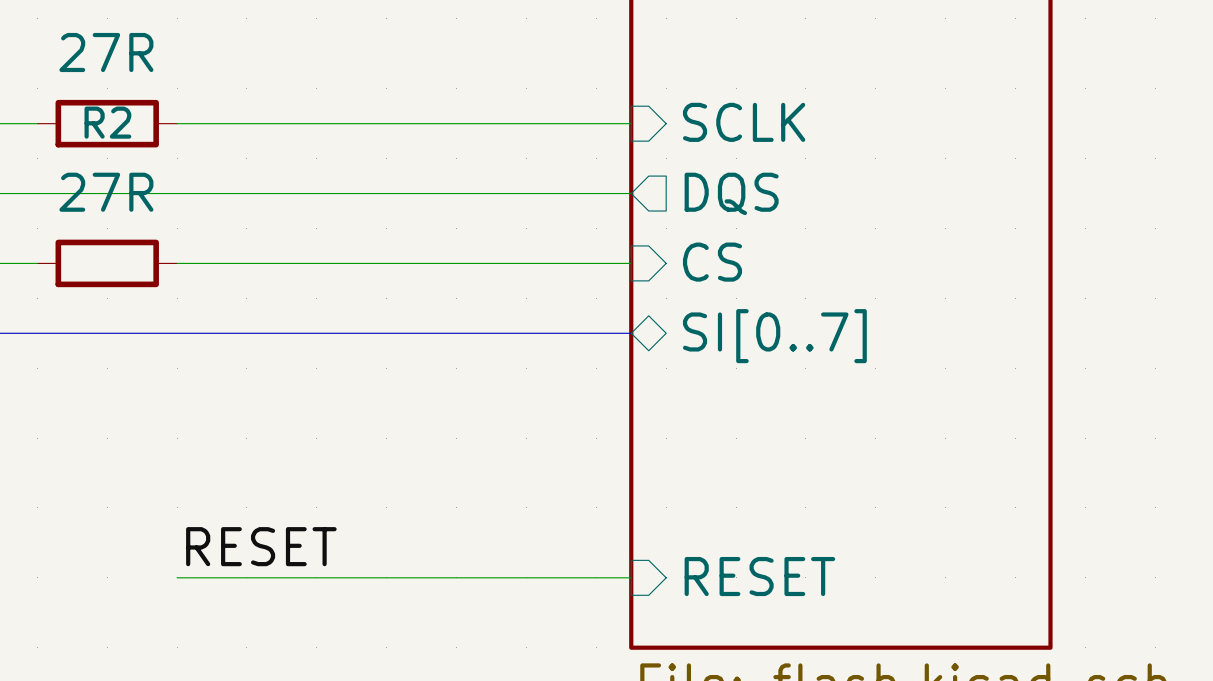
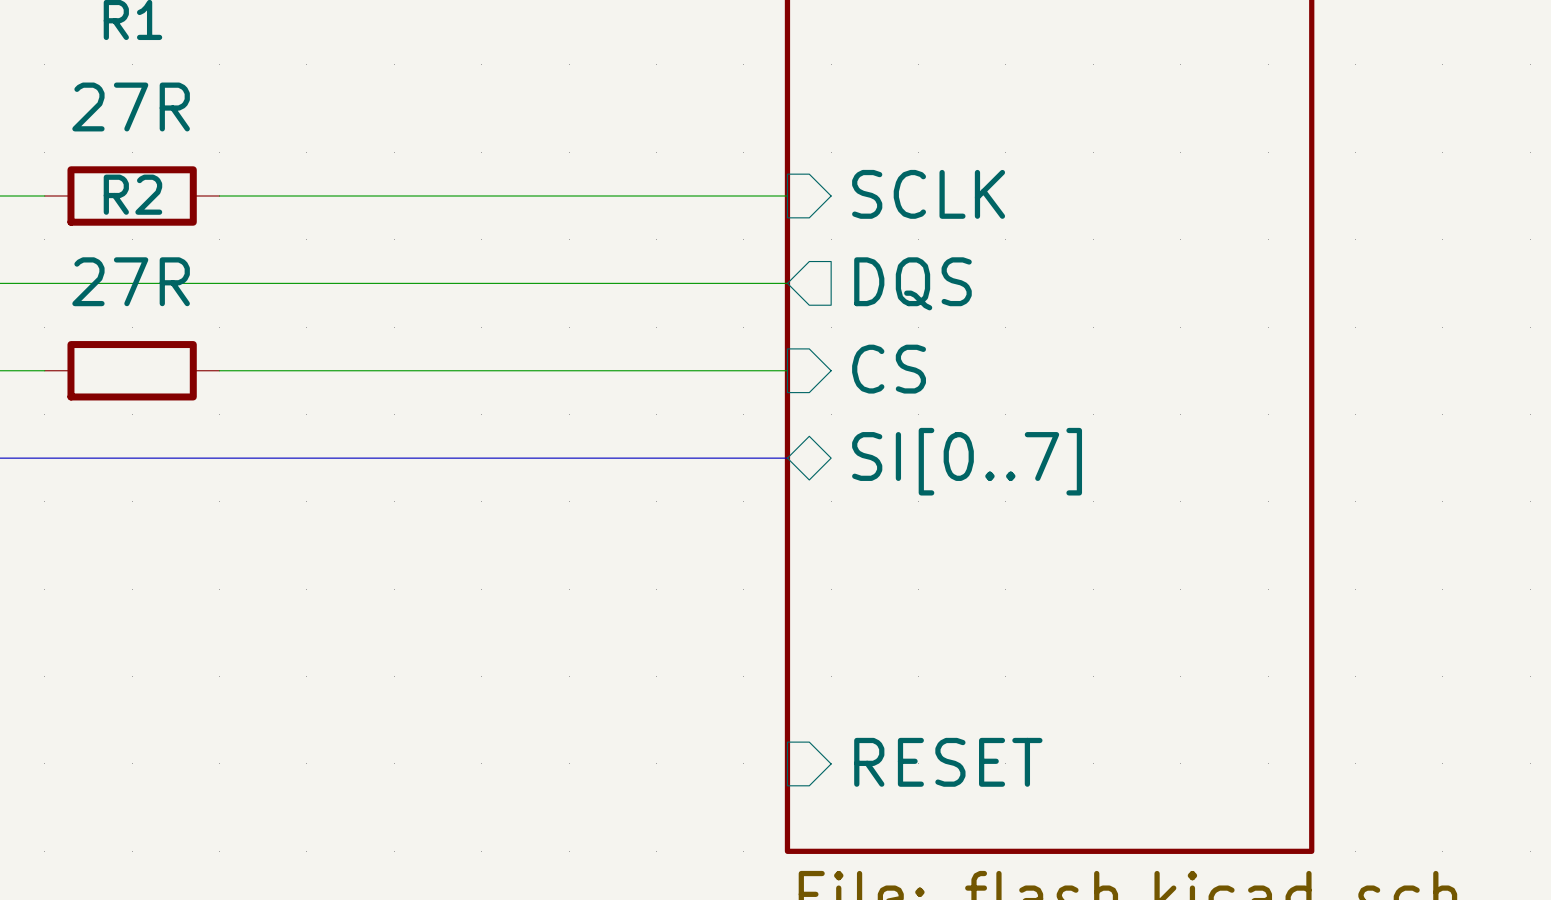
label: RESET (261, 546) -> none
wire: (177, 577) (631, 577) -> none

